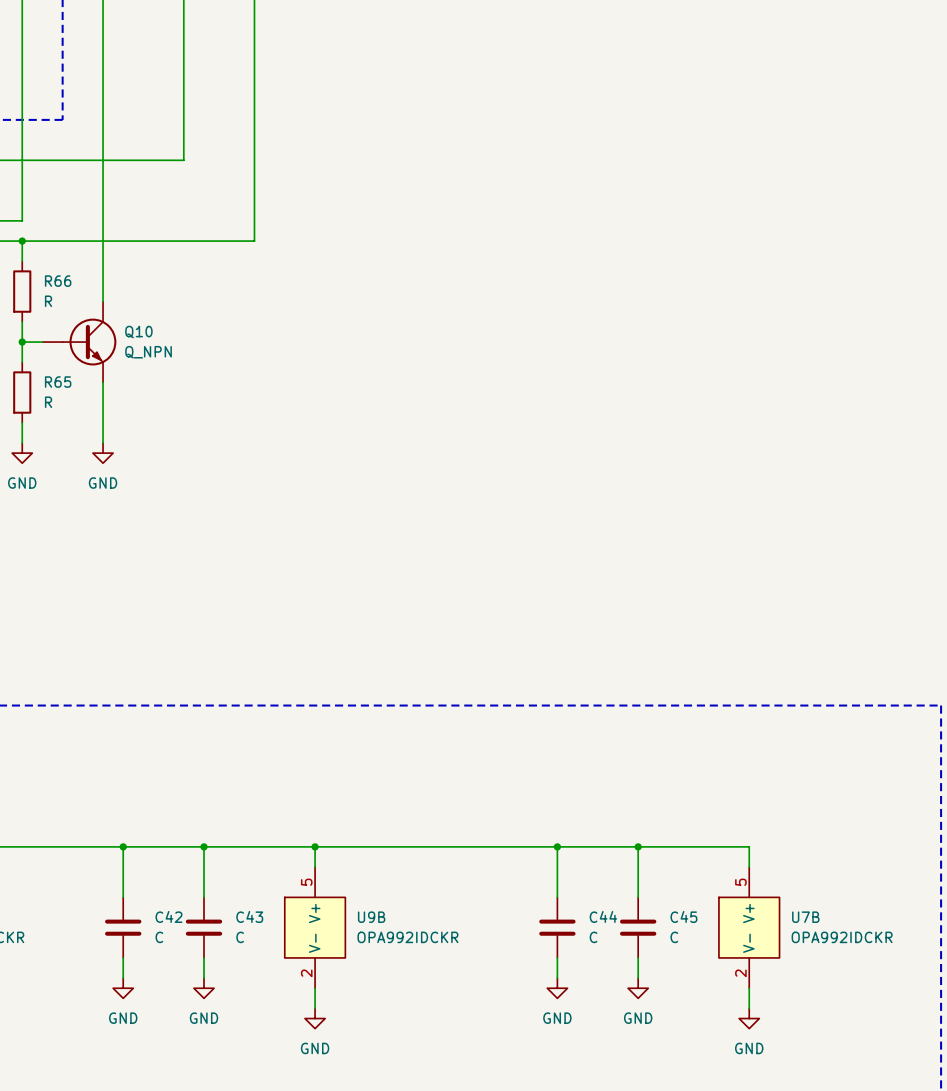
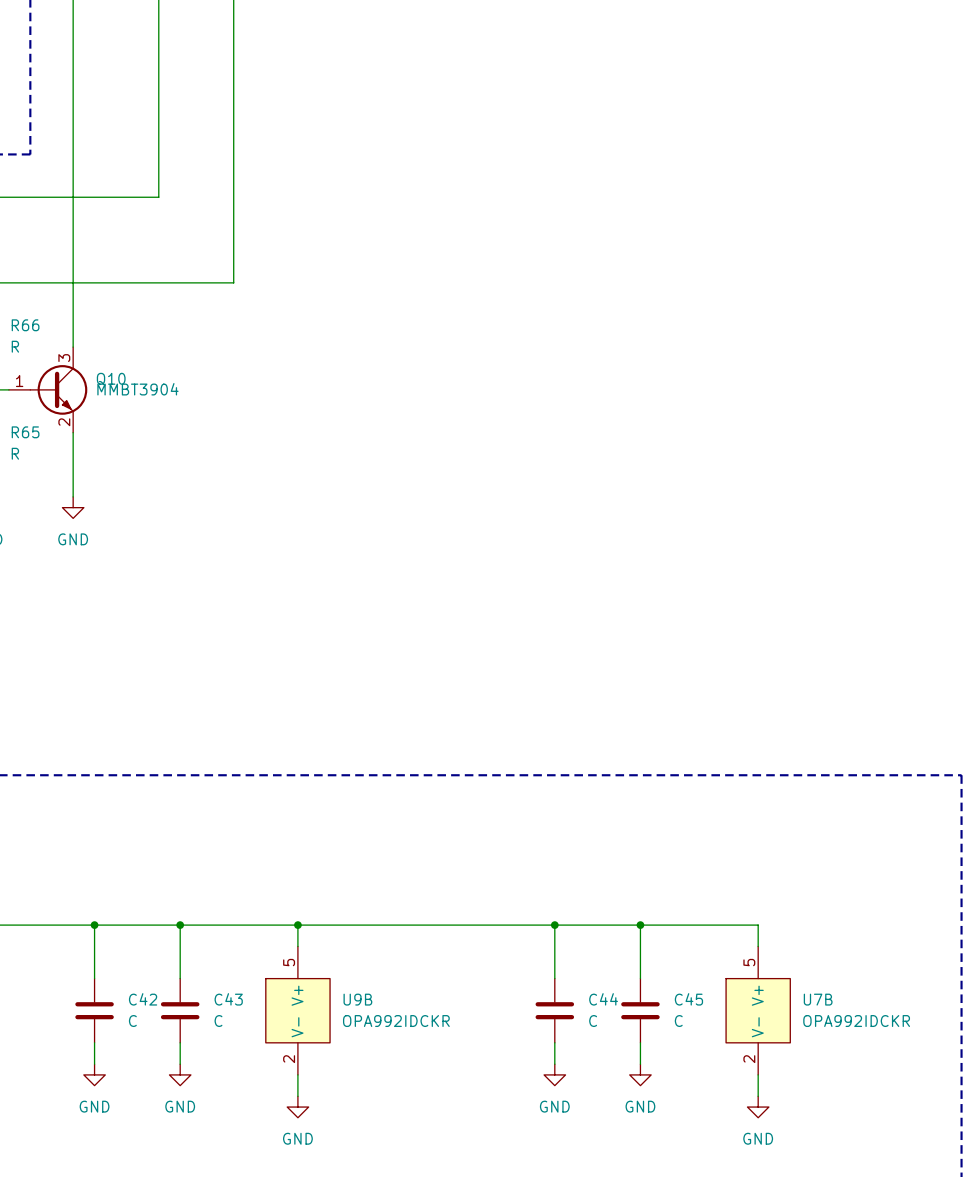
Q10 pin number: none -> 3 (64, 358)
Q10 pin number: none -> 1 (19, 381)
Q10 value: Q_NPN (148, 352) -> MMBT3904 (137, 389)
Q10 pin number: none -> 2 (64, 422)

